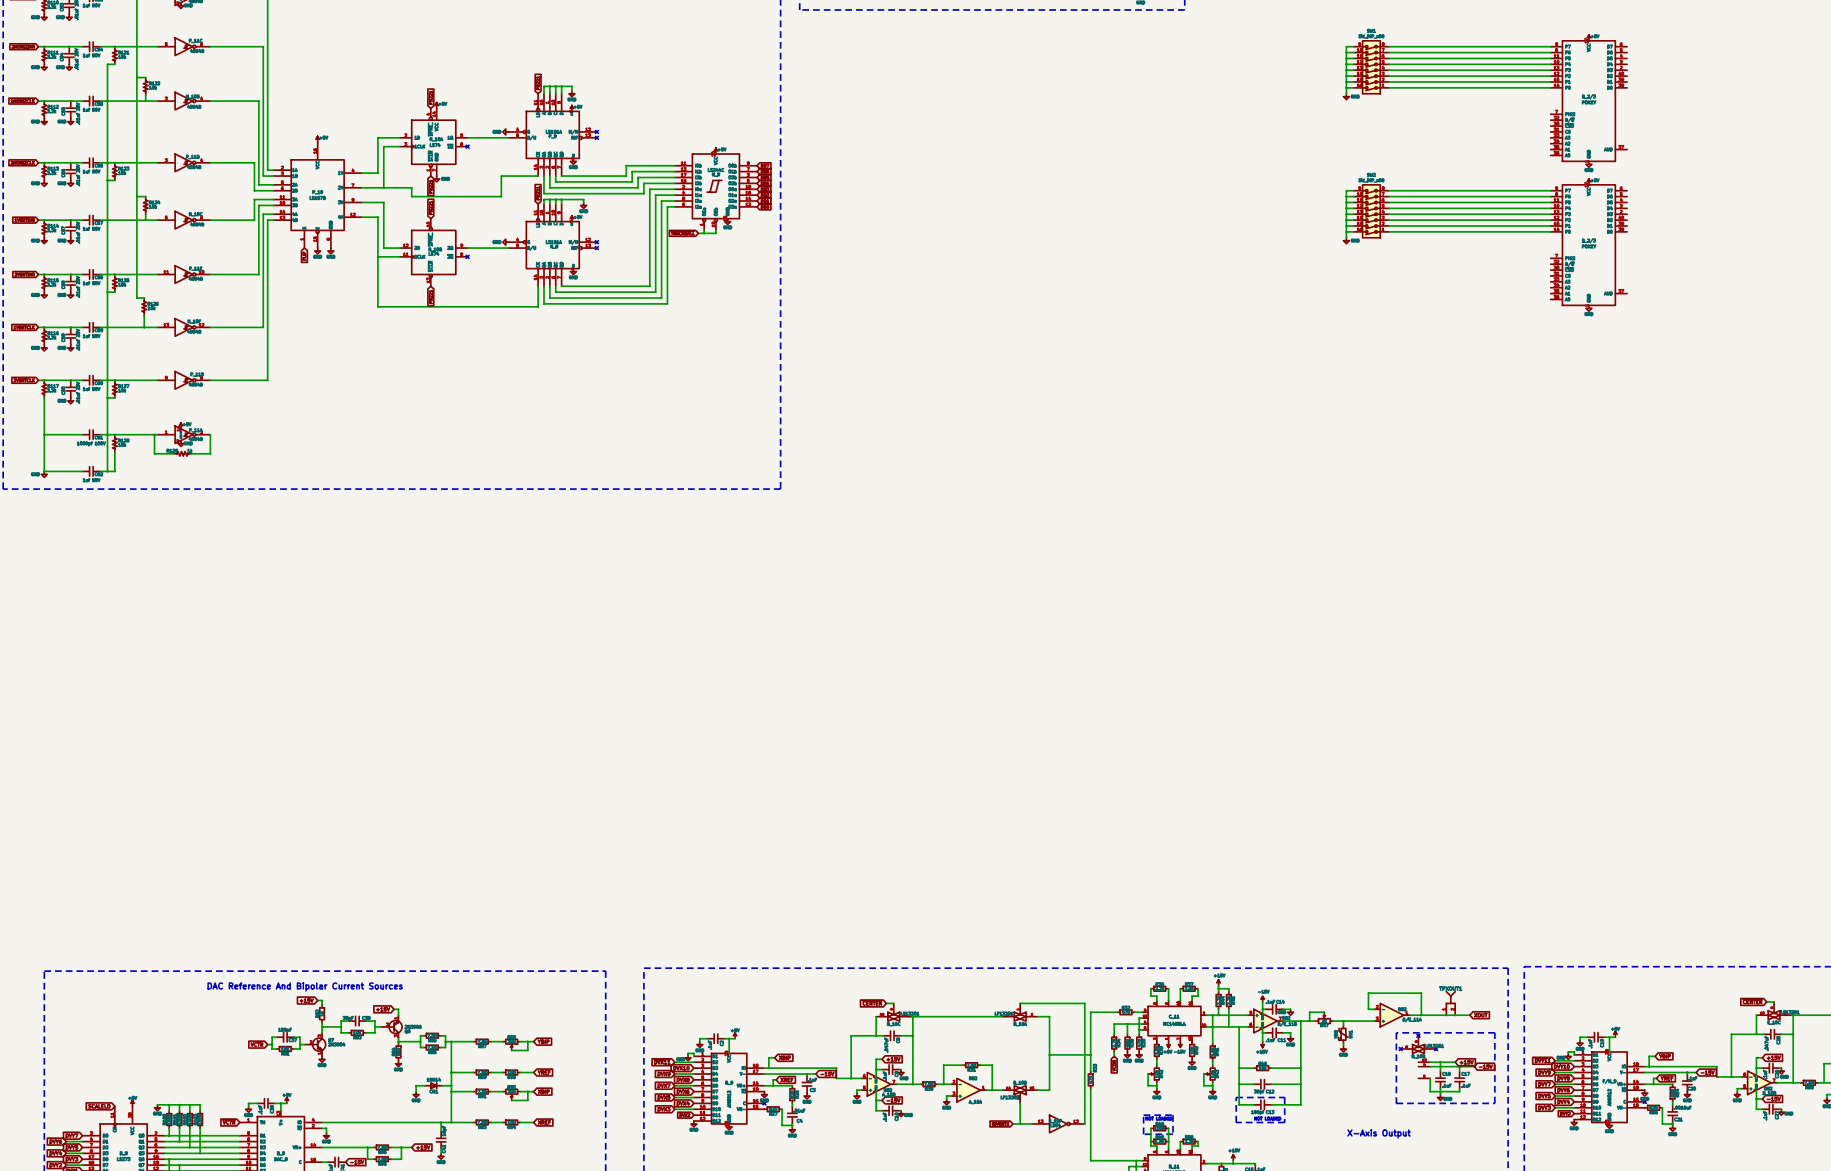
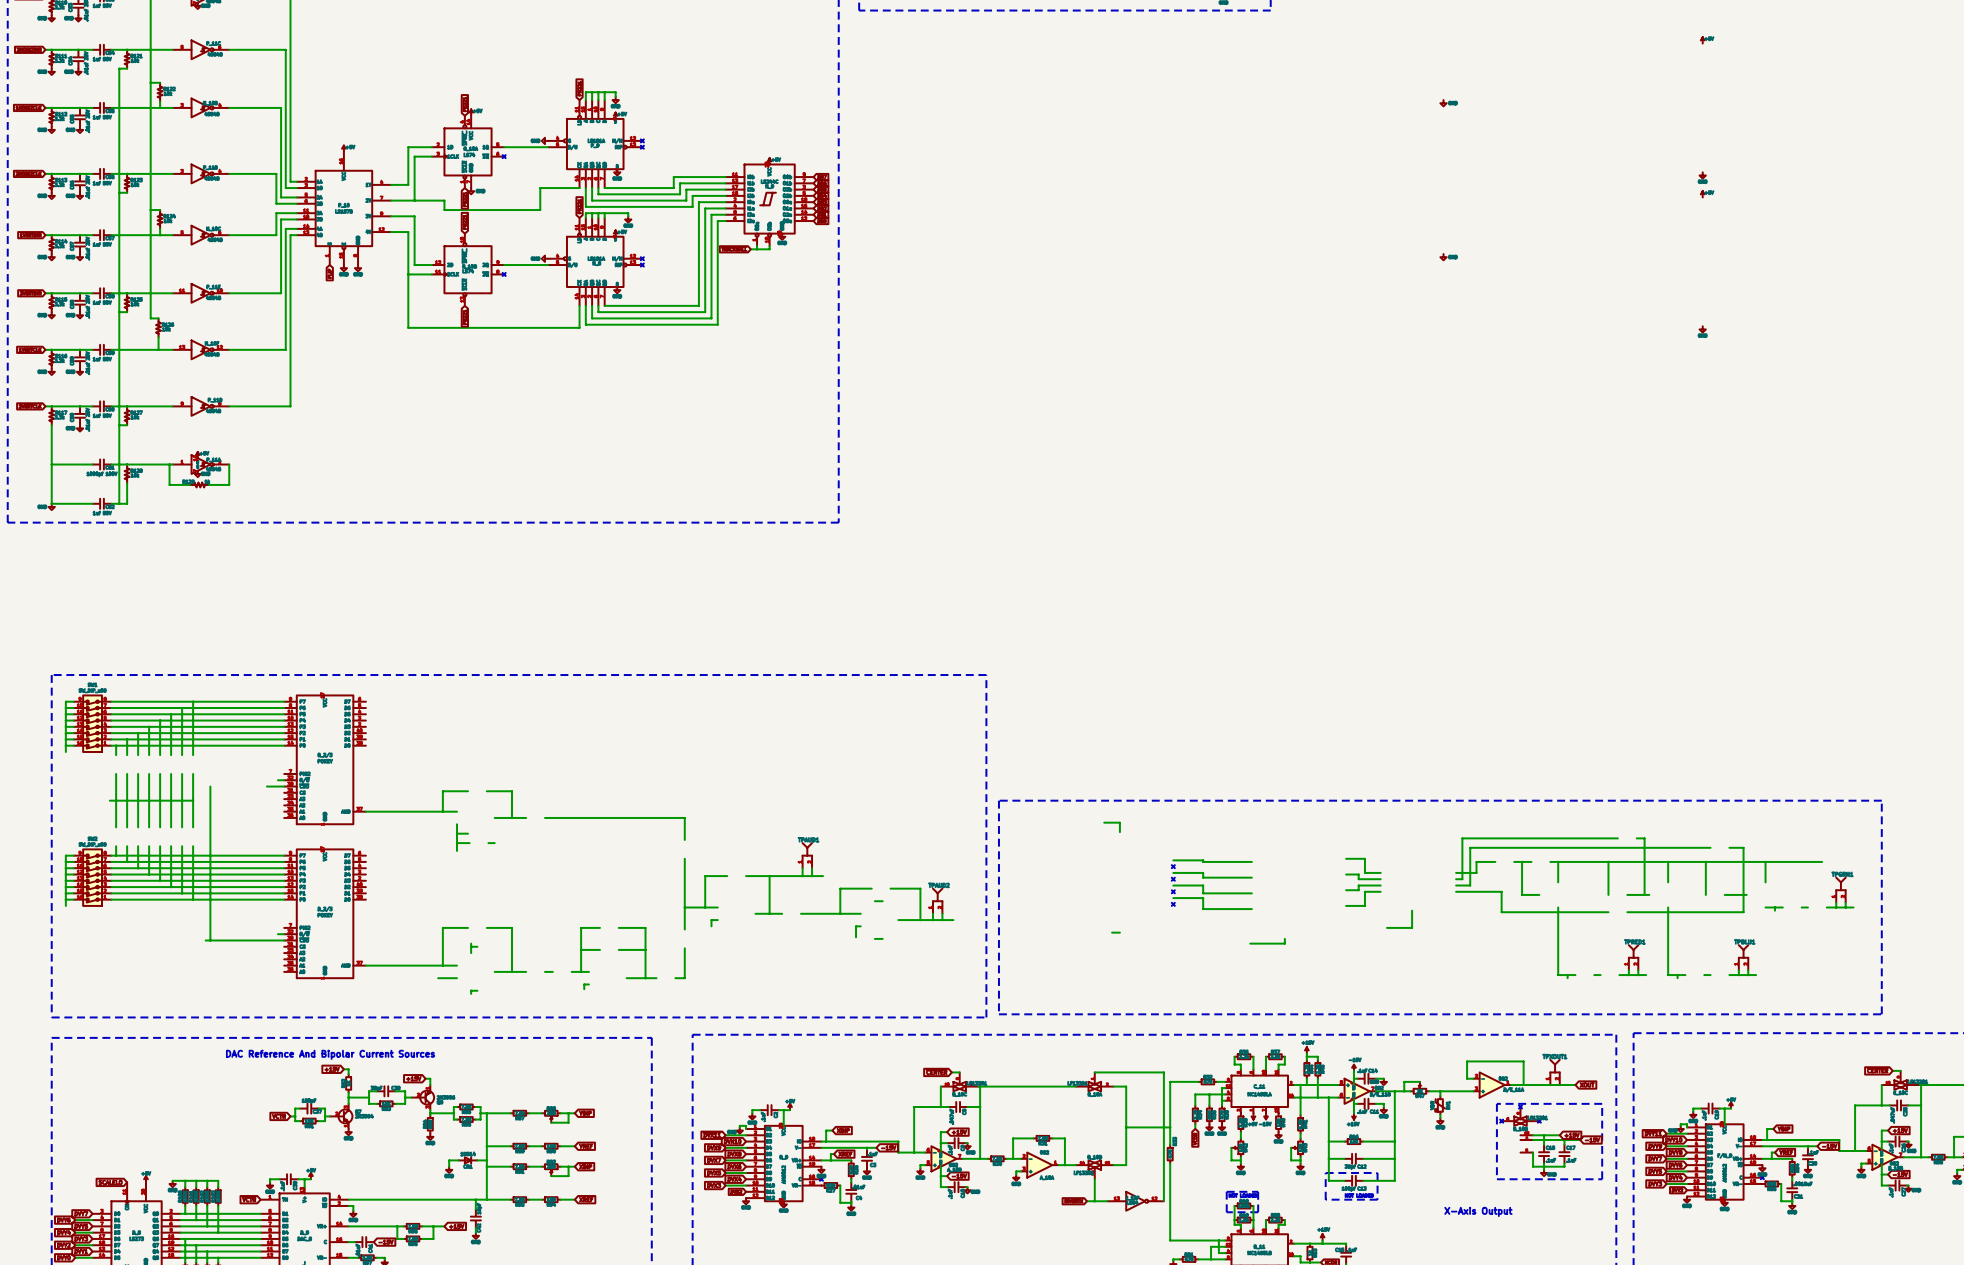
wire: (1353, 46) (1346, 46) (1346, 93) -> none
wire: (1389, 46) (1550, 46) -> none
wire: (1346, 52) (1353, 52) -> none
wire: (1389, 52) (1550, 52) -> none
wire: (1346, 58) (1353, 58) -> none
wire: (1389, 58) (1550, 58) -> none
wire: (1346, 64) (1353, 64) -> none
wire: (1389, 64) (1550, 64) -> none
part position: (1371, 67) -> (92, 723)
wire: (1346, 70) (1353, 70) -> none
wire: (1389, 70) (1550, 70) -> none
wire: (1346, 76) (1353, 76) -> none
wire: (1389, 76) (1550, 76) -> none
wire: (1346, 81) (1353, 81) -> none
wire: (1389, 81) (1550, 81) -> none
wire: (1346, 87) (1353, 87) -> none
wire: (1389, 87) (1550, 87) -> none
part position: (1588, 101) -> (325, 759)
wire: (1353, 190) (1346, 190) (1346, 237) -> none
wire: (1389, 190) (1550, 190) -> none
wire: (1346, 196) (1353, 196) -> none
wire: (1389, 196) (1550, 196) -> none
wire: (1346, 202) (1353, 202) -> none
wire: (1389, 202) (1550, 202) -> none
wire: (1346, 208) (1353, 208) -> none
wire: (1389, 208) (1550, 208) -> none
part position: (1371, 211) -> (92, 877)
wire: (1346, 214) (1353, 214) -> none
wire: (1389, 214) (1550, 214) -> none
wire: (1346, 220) (1353, 220) -> none
wire: (1389, 220) (1550, 220) -> none
wire: (1346, 226) (1353, 226) -> none
wire: (1389, 226) (1550, 226) -> none
wire: (1346, 231) (1353, 231) -> none
wire: (1389, 231) (1550, 231) -> none
part position: (1588, 245) -> (325, 913)
line: none -> (51, 675) (51, 1017) (986, 1017) (986, 675) (51, 675)
wire: none -> (73, 701) (65, 701) (65, 751)
wire: none -> (111, 701) (284, 701)
wire: none -> (193, 701) (193, 755)
wire: none -> (65, 708) (73, 708)
wire: none -> (111, 708) (284, 708)
wire: none -> (182, 708) (182, 755)
wire: none -> (65, 714) (73, 714)
wire: none -> (111, 714) (284, 714)
wire: none -> (171, 714) (171, 755)
wire: none -> (65, 720) (73, 720)
wire: none -> (111, 720) (284, 720)
wire: none -> (160, 720) (160, 755)
wire: none -> (65, 726) (73, 726)
wire: none -> (111, 726) (284, 726)
wire: none -> (149, 726) (149, 755)
wire: none -> (65, 733) (73, 733)
wire: none -> (111, 733) (284, 733)
wire: none -> (138, 733) (138, 755)
wire: none -> (65, 739) (73, 739)
wire: none -> (111, 739) (284, 739)
wire: none -> (127, 739) (127, 755)
wire: none -> (65, 745) (73, 745)
wire: none -> (111, 745) (284, 745)
wire: none -> (116, 745) (116, 755)
wire: none -> (116, 773) (116, 827)
wire: none -> (127, 773) (127, 827)
wire: none -> (138, 773) (138, 827)
wire: none -> (149, 773) (149, 827)
wire: none -> (160, 773) (160, 827)
wire: none -> (171, 773) (171, 827)
wire: none -> (182, 773) (182, 827)
wire: none -> (193, 773) (193, 827)
wire: none -> (277, 780) (284, 780)
wire: none -> (210, 786) (210, 940)
wire: none -> (266, 786) (284, 786)
wire: none -> (468, 791) (442, 791) (442, 811)
wire: none -> (486, 791) (511, 791) (511, 817)
wire: none -> (109, 800) (193, 800)
line: none -> (998, 800) (998, 1014) (1881, 1014) (1881, 800) (998, 800)
wire: none -> (365, 811) (457, 811)
wire: none -> (494, 817) (526, 817)
wire: none -> (544, 817) (684, 817) (684, 839)
wire: none -> (1104, 822) (1119, 822) (1119, 832)
wire: none -> (457, 824) (457, 850)
wire: none -> (457, 833) (468, 833)
wire: none -> (1617, 838) (1462, 838) (1462, 879) (1456, 879)
wire: none -> (1636, 838) (1644, 838) (1644, 894)
wire: none -> (457, 843) (469, 843)
wire: none -> (488, 843) (494, 843)
wire: none -> (116, 846) (116, 855)
wire: none -> (127, 846) (127, 861)
wire: none -> (138, 846) (138, 868)
wire: none -> (149, 846) (149, 874)
wire: none -> (160, 846) (160, 880)
wire: none -> (171, 846) (171, 887)
wire: none -> (182, 846) (182, 893)
wire: none -> (193, 846) (193, 899)
wire: none -> (1710, 847) (1470, 847) (1470, 885) (1456, 885)
wire: none -> (1729, 847) (1743, 847) (1743, 912) (1627, 912)
wire: none -> (73, 855) (65, 855) (65, 905)
wire: none -> (111, 855) (284, 855)
part: none -> (807, 855)
wire: none -> (684, 858) (684, 929)
wire: none -> (1346, 858) (1364, 858) (1364, 872) (1380, 872)
wire: none -> (1173, 860) (1251, 861)
wire: none -> (65, 861) (73, 861)
wire: none -> (111, 861) (284, 861)
wire: none -> (1495, 861) (1476, 861) (1476, 872) (1456, 872)
wire: none -> (1514, 861) (1531, 861)
wire: none -> (1522, 861) (1522, 894) (1539, 894)
wire: none -> (1550, 861) (1822, 861)
wire: none -> (1558, 861) (1558, 882)
wire: none -> (1608, 861) (1608, 894)
wire: none -> (1668, 861) (1668, 882)
wire: none -> (1705, 861) (1705, 894)
wire: none -> (1765, 861) (1765, 882)
no-connect mark: none -> (1173, 866)
wire: none -> (65, 868) (73, 868)
wire: none -> (111, 868) (284, 868)
wire: none -> (802, 868) (802, 876)
wire: none -> (812, 868) (812, 876)
wire: none -> (1173, 872) (1203, 872) (1203, 877) (1251, 877)
wire: none -> (65, 874) (73, 874)
wire: none -> (111, 874) (284, 874)
wire: none -> (1346, 874) (1358, 874) (1358, 879) (1380, 879)
wire: none -> (727, 876) (705, 876) (705, 907)
wire: none -> (746, 876) (823, 876)
wire: none -> (769, 876) (769, 913)
no-connect mark: none -> (1173, 879)
wire: none -> (65, 880) (73, 880)
wire: none -> (111, 880) (284, 880)
wire: none -> (1173, 885) (1203, 885) (1203, 893) (1251, 893)
wire: none -> (1380, 885) (1358, 885) (1358, 890) (1346, 890)
wire: none -> (65, 887) (73, 887)
wire: none -> (111, 887) (284, 887)
wire: none -> (871, 888) (840, 888) (840, 913)
wire: none -> (890, 888) (920, 888) (920, 920)
part: none -> (1840, 890)
no-connect mark: none -> (1173, 891)
wire: none -> (1380, 891) (1364, 891) (1364, 905) (1346, 905)
wire: none -> (1456, 891) (1501, 891) (1501, 912) (1608, 912)
wire: none -> (65, 893) (73, 893)
wire: none -> (111, 893) (284, 893)
wire: none -> (1627, 894) (1649, 894)
wire: none -> (1724, 894) (1746, 894)
wire: none -> (1173, 898) (1203, 898) (1203, 909) (1251, 909)
wire: none -> (65, 899) (73, 899)
wire: none -> (111, 899) (284, 899)
wire: none -> (874, 901) (882, 901)
part: none -> (937, 901)
wire: none -> (1836, 902) (1836, 907)
wire: none -> (1845, 902) (1845, 907)
no-connect mark: none -> (1173, 904)
wire: none -> (684, 907) (717, 907)
wire: none -> (1558, 907) (1558, 975) (1575, 975)
wire: none -> (1668, 907) (1668, 975) (1685, 975)
wire: none -> (1765, 907) (1782, 907)
wire: none -> (1774, 907) (1774, 910)
wire: none -> (1801, 907) (1807, 907)
wire: none -> (1826, 907) (1853, 907)
wire: none -> (1412, 910) (1412, 927) (1386, 927)
wire: none -> (755, 913) (782, 913)
wire: none -> (801, 913) (860, 913)
wire: none -> (932, 913) (932, 920)
wire: none -> (942, 913) (942, 920)
wire: none -> (717, 920) (711, 920) (711, 926)
wire: none -> (898, 920) (953, 920)
wire: none -> (860, 926) (856, 926) (856, 937)
wire: none -> (468, 927) (442, 927) (442, 965)
wire: none -> (486, 927) (511, 927) (511, 971)
wire: none -> (599, 927) (581, 927) (581, 971)
wire: none -> (618, 927) (645, 927) (645, 978)
wire: none -> (1112, 932) (1119, 932)
wire: none -> (277, 934) (284, 934)
wire: none -> (874, 938) (882, 938)
wire: none -> (1284, 938) (1284, 943) (1250, 943)
wire: none -> (205, 940) (284, 940)
wire: none -> (471, 943) (471, 953)
wire: none -> (471, 946) (477, 946)
wire: none -> (684, 948) (684, 978) (675, 978)
wire: none -> (581, 949) (599, 949)
wire: none -> (618, 949) (645, 949)
part: none -> (1633, 957)
part: none -> (1743, 957)
wire: none -> (365, 965) (457, 965)
wire: none -> (1628, 970) (1628, 975)
wire: none -> (1638, 970) (1638, 975)
wire: none -> (1738, 970) (1738, 975)
wire: none -> (1748, 970) (1748, 975)
wire: none -> (494, 971) (526, 971)
wire: none -> (544, 971) (552, 971)
wire: none -> (571, 971) (588, 971)
wire: none -> (1567, 975) (1567, 978)
wire: none -> (1594, 975) (1600, 975)
wire: none -> (1619, 975) (1646, 975)
wire: none -> (1677, 975) (1677, 978)
wire: none -> (1704, 975) (1710, 975)
wire: none -> (1729, 975) (1756, 975)
wire: none -> (438, 978) (457, 978)
wire: none -> (626, 978) (656, 978)
wire: none -> (588, 984) (584, 984) (584, 989)
wire: none -> (477, 990) (471, 990) (471, 993)

